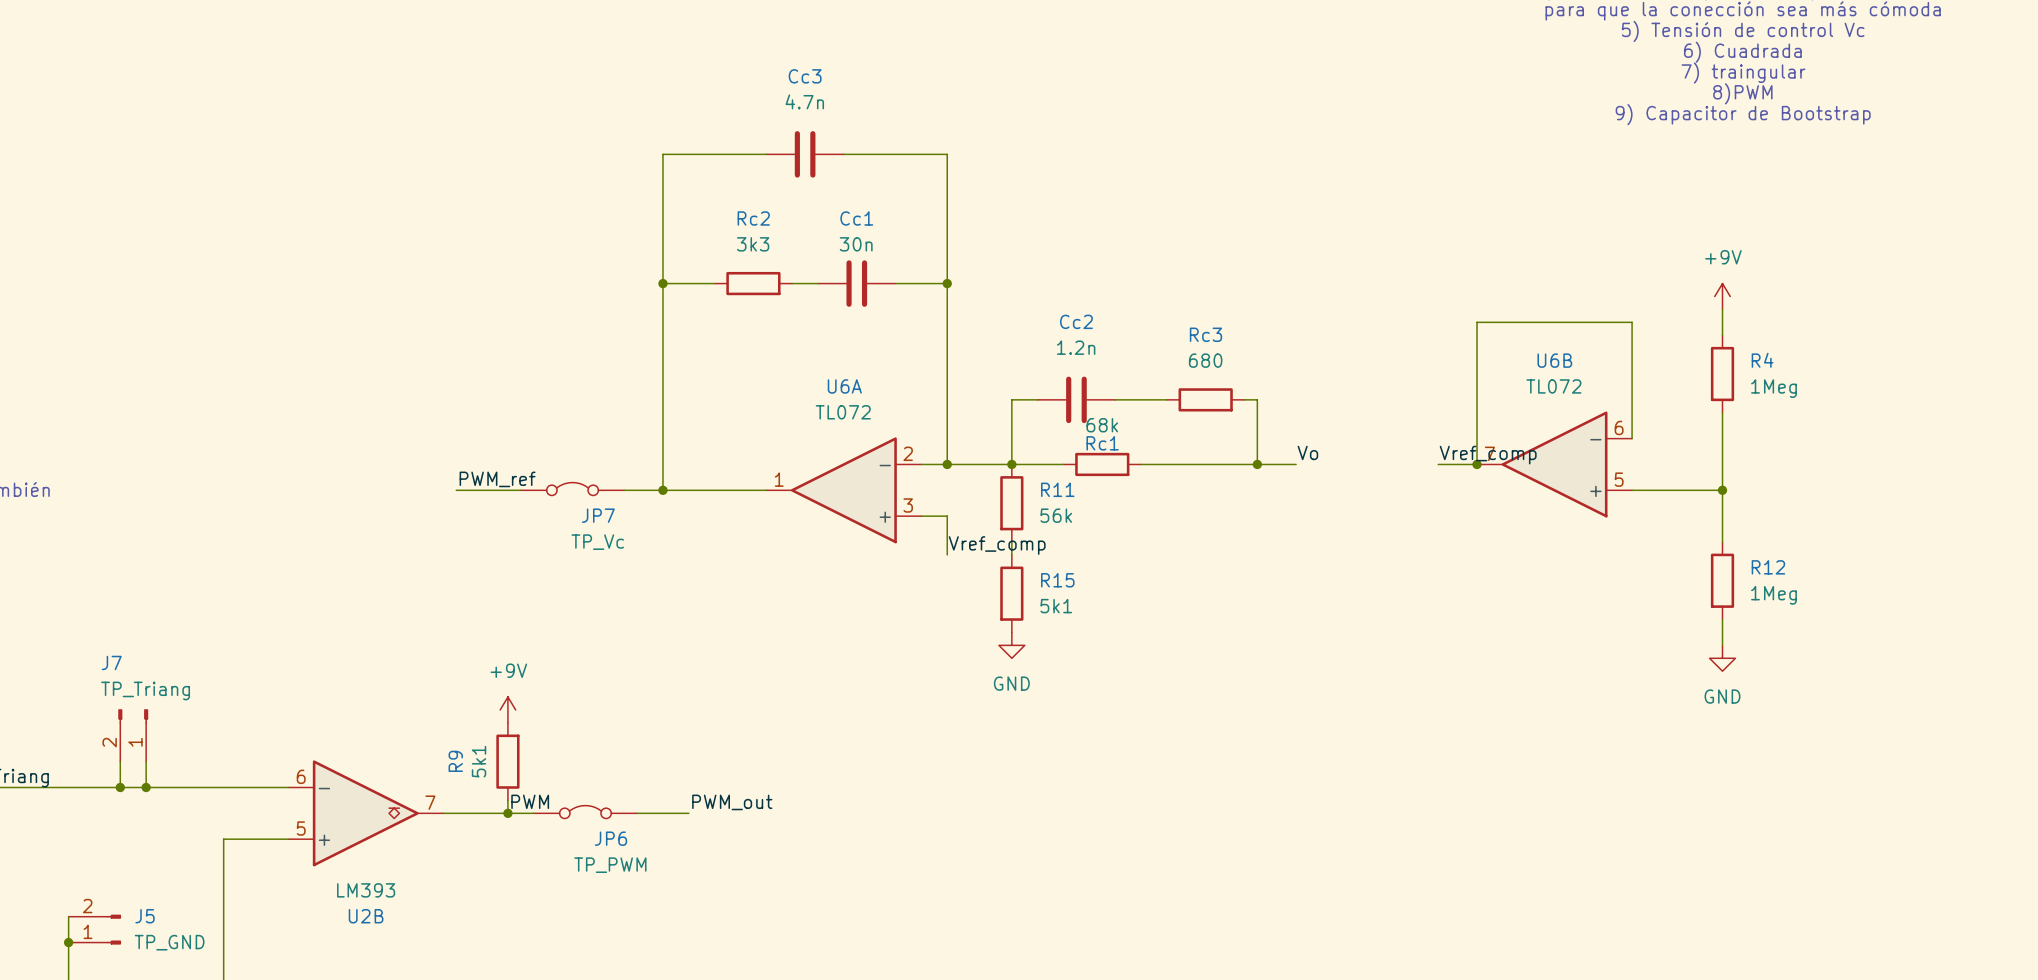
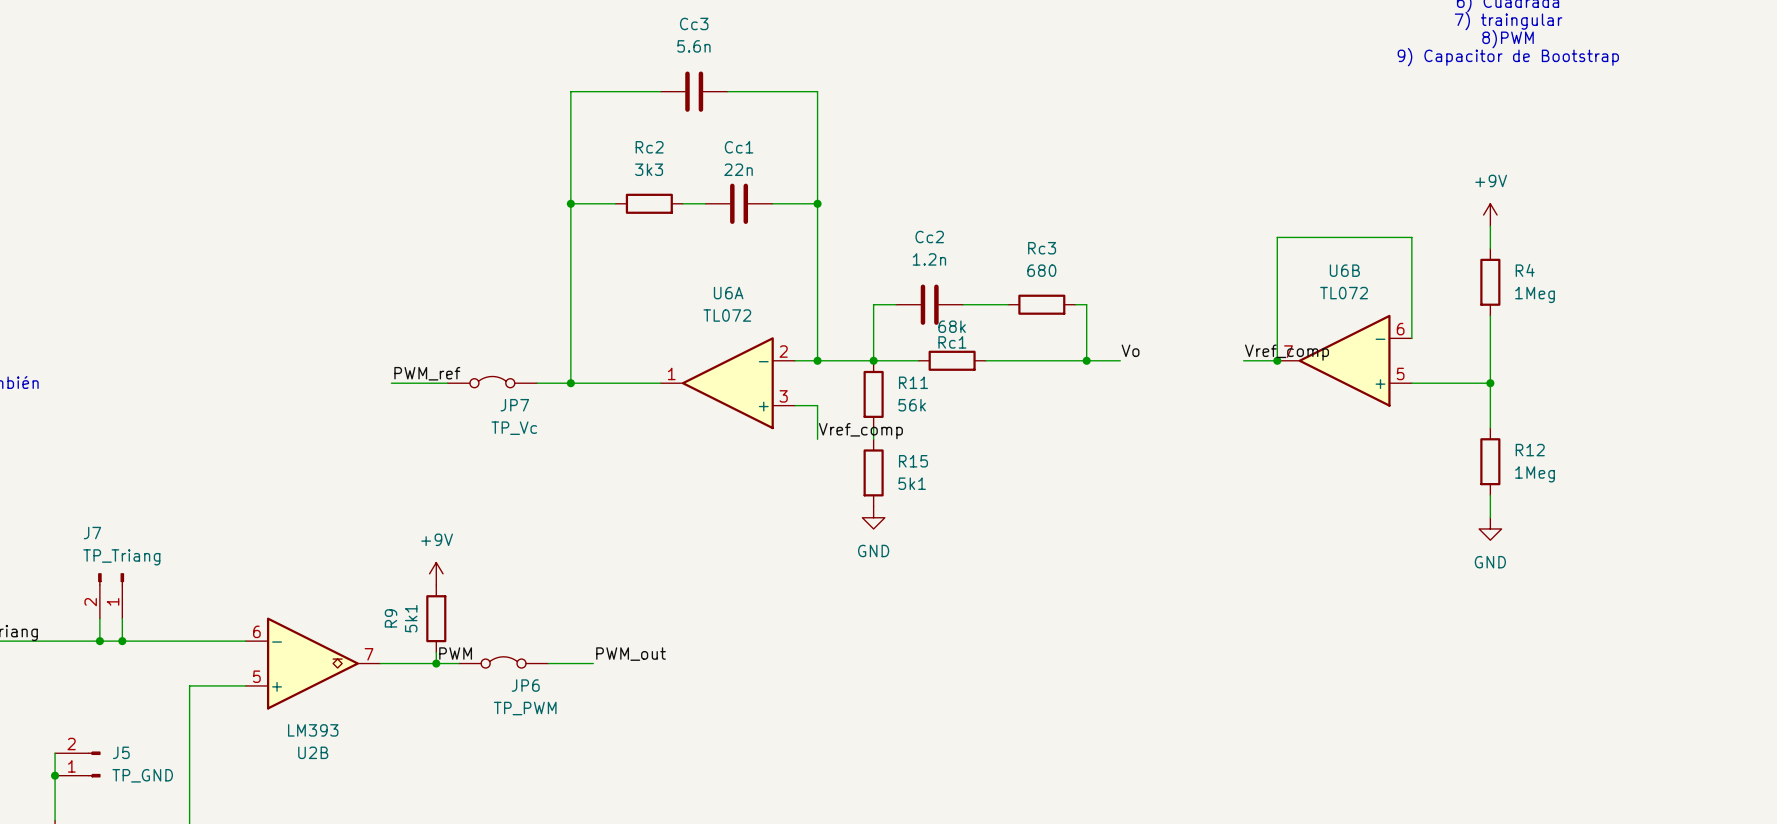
Cc3 value: 4.7n (804, 101) -> 5.6n (693, 46)
Cc1 value: 30n (856, 244) -> 22n (738, 169)

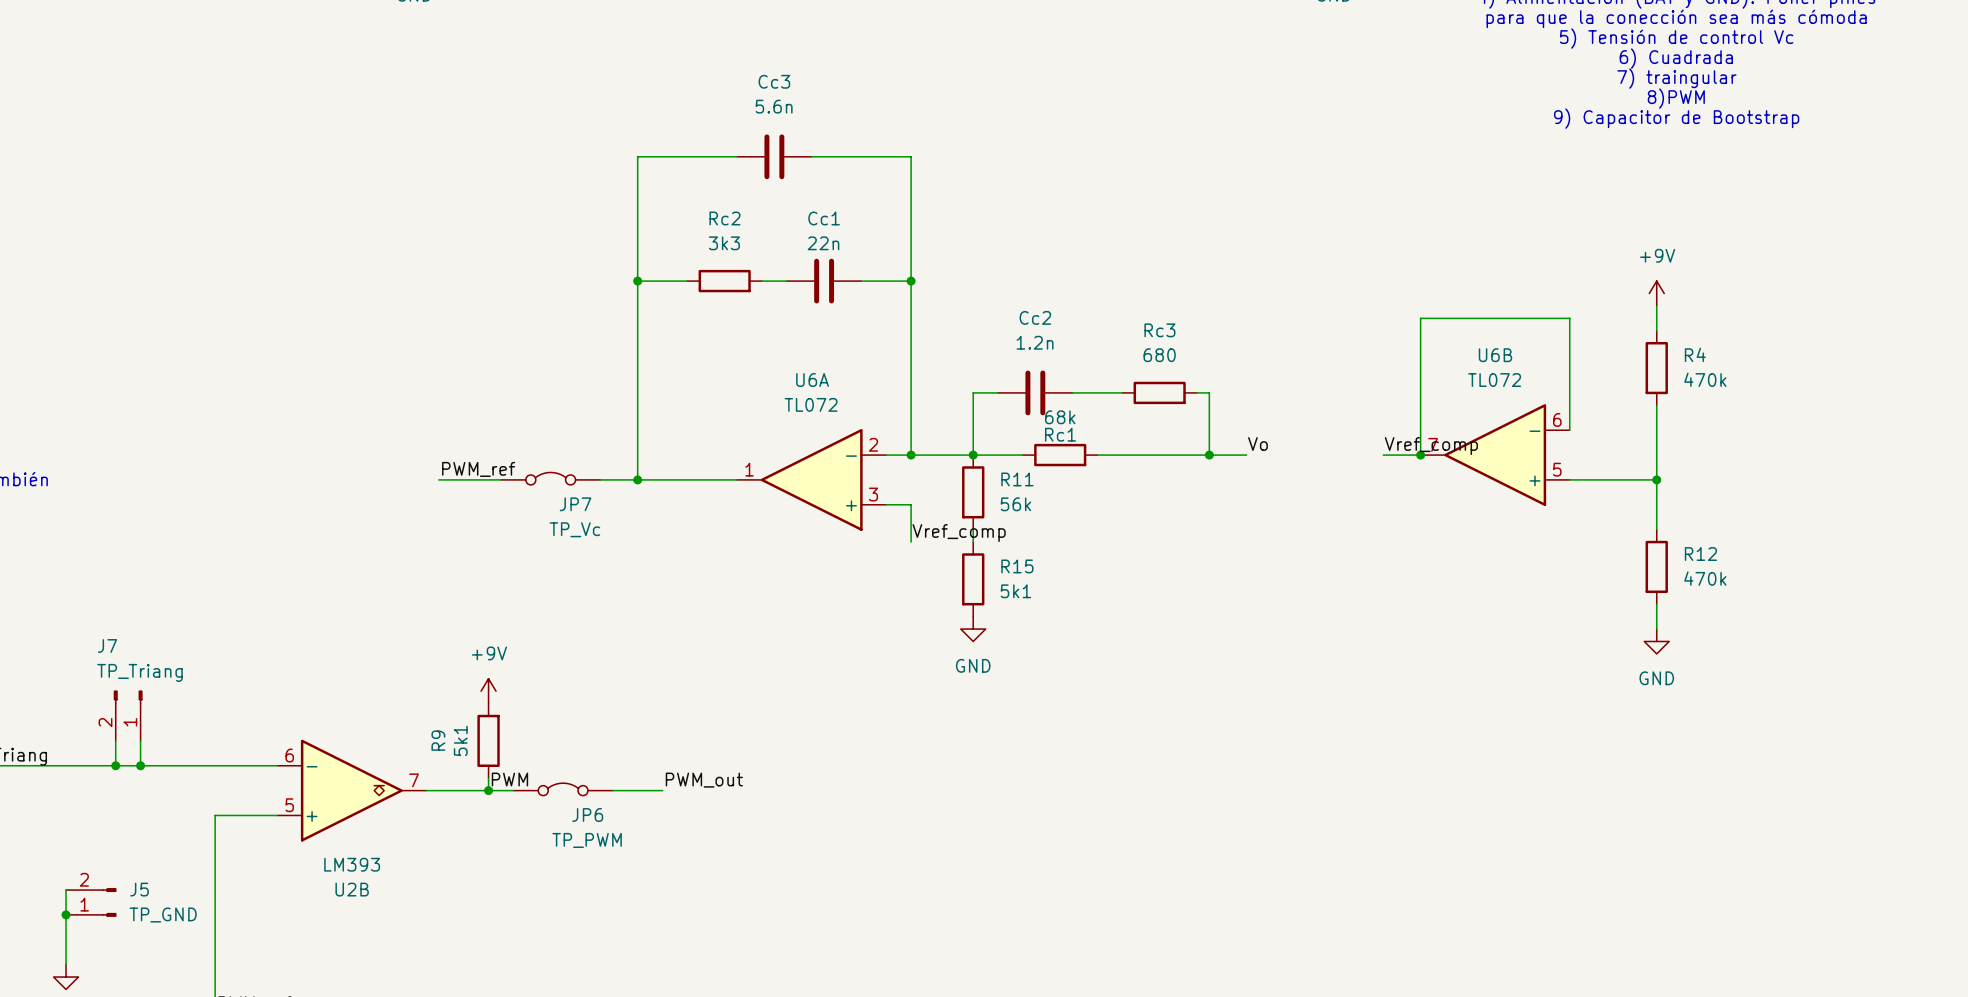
R4 value: 1Meg (1535, 294) -> 470k (1705, 379)
R12 value: 1Meg (1535, 474) -> 470k (1705, 578)

